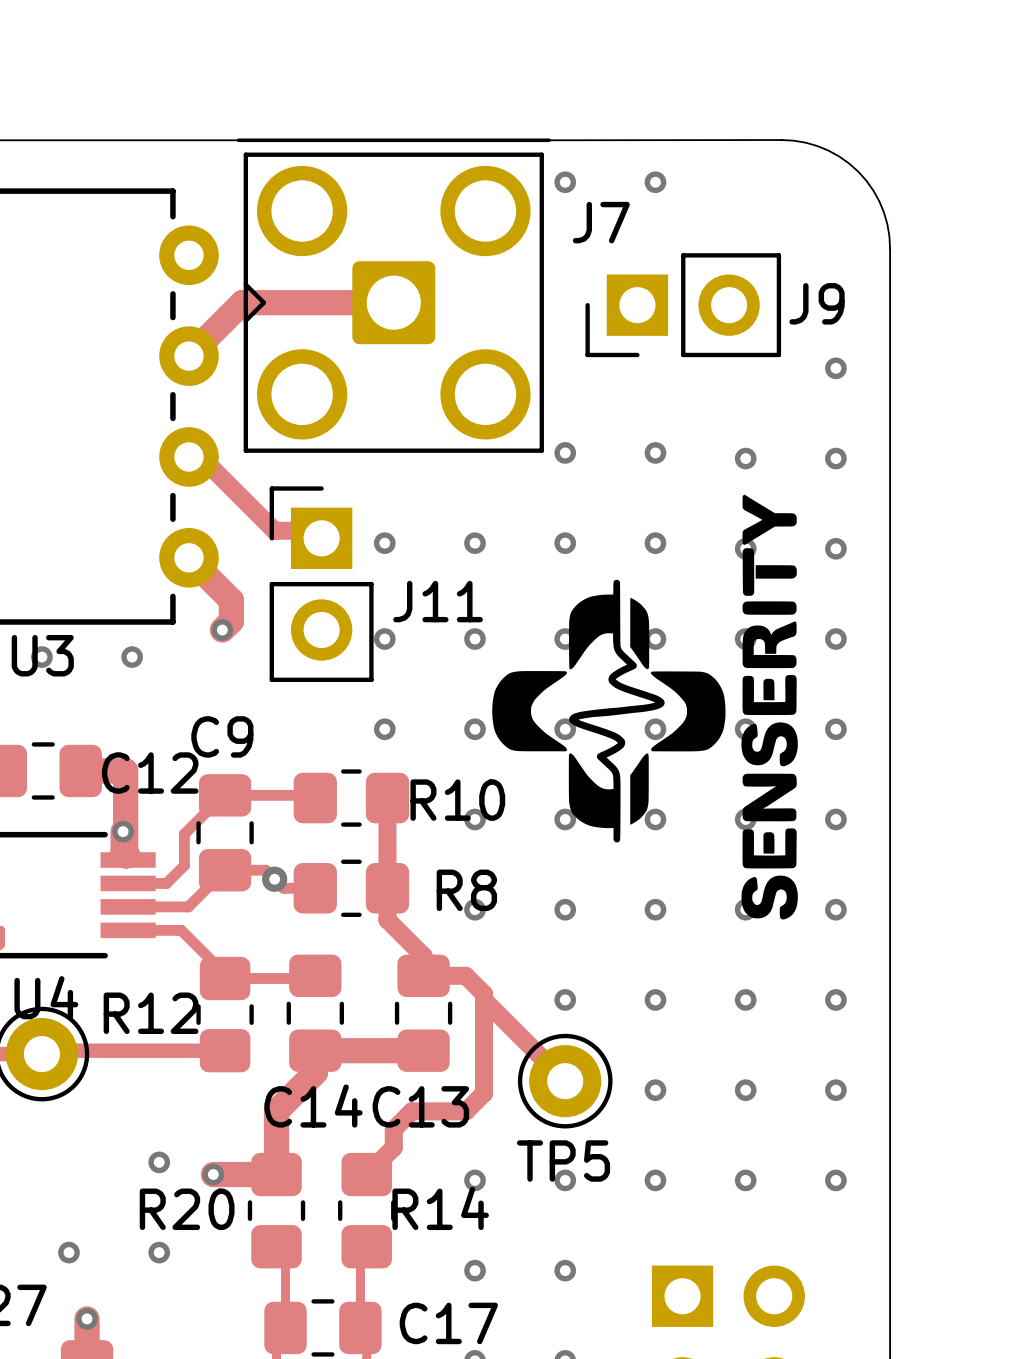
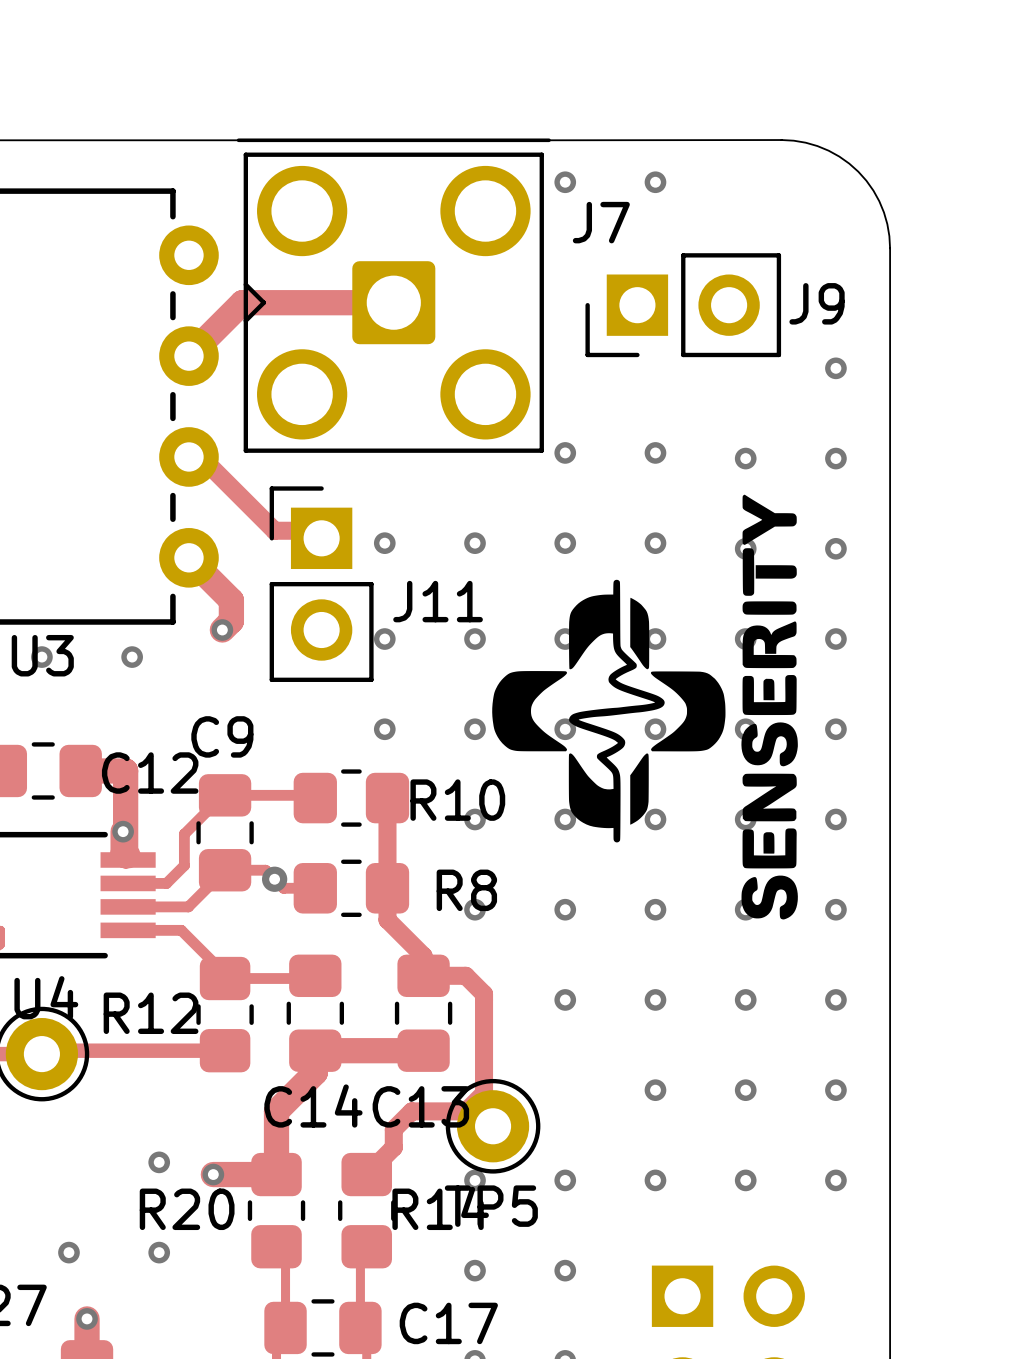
track: (484, 999) (565, 1081) -> none
TP5 position: (565, 1081) -> (493, 1126)

